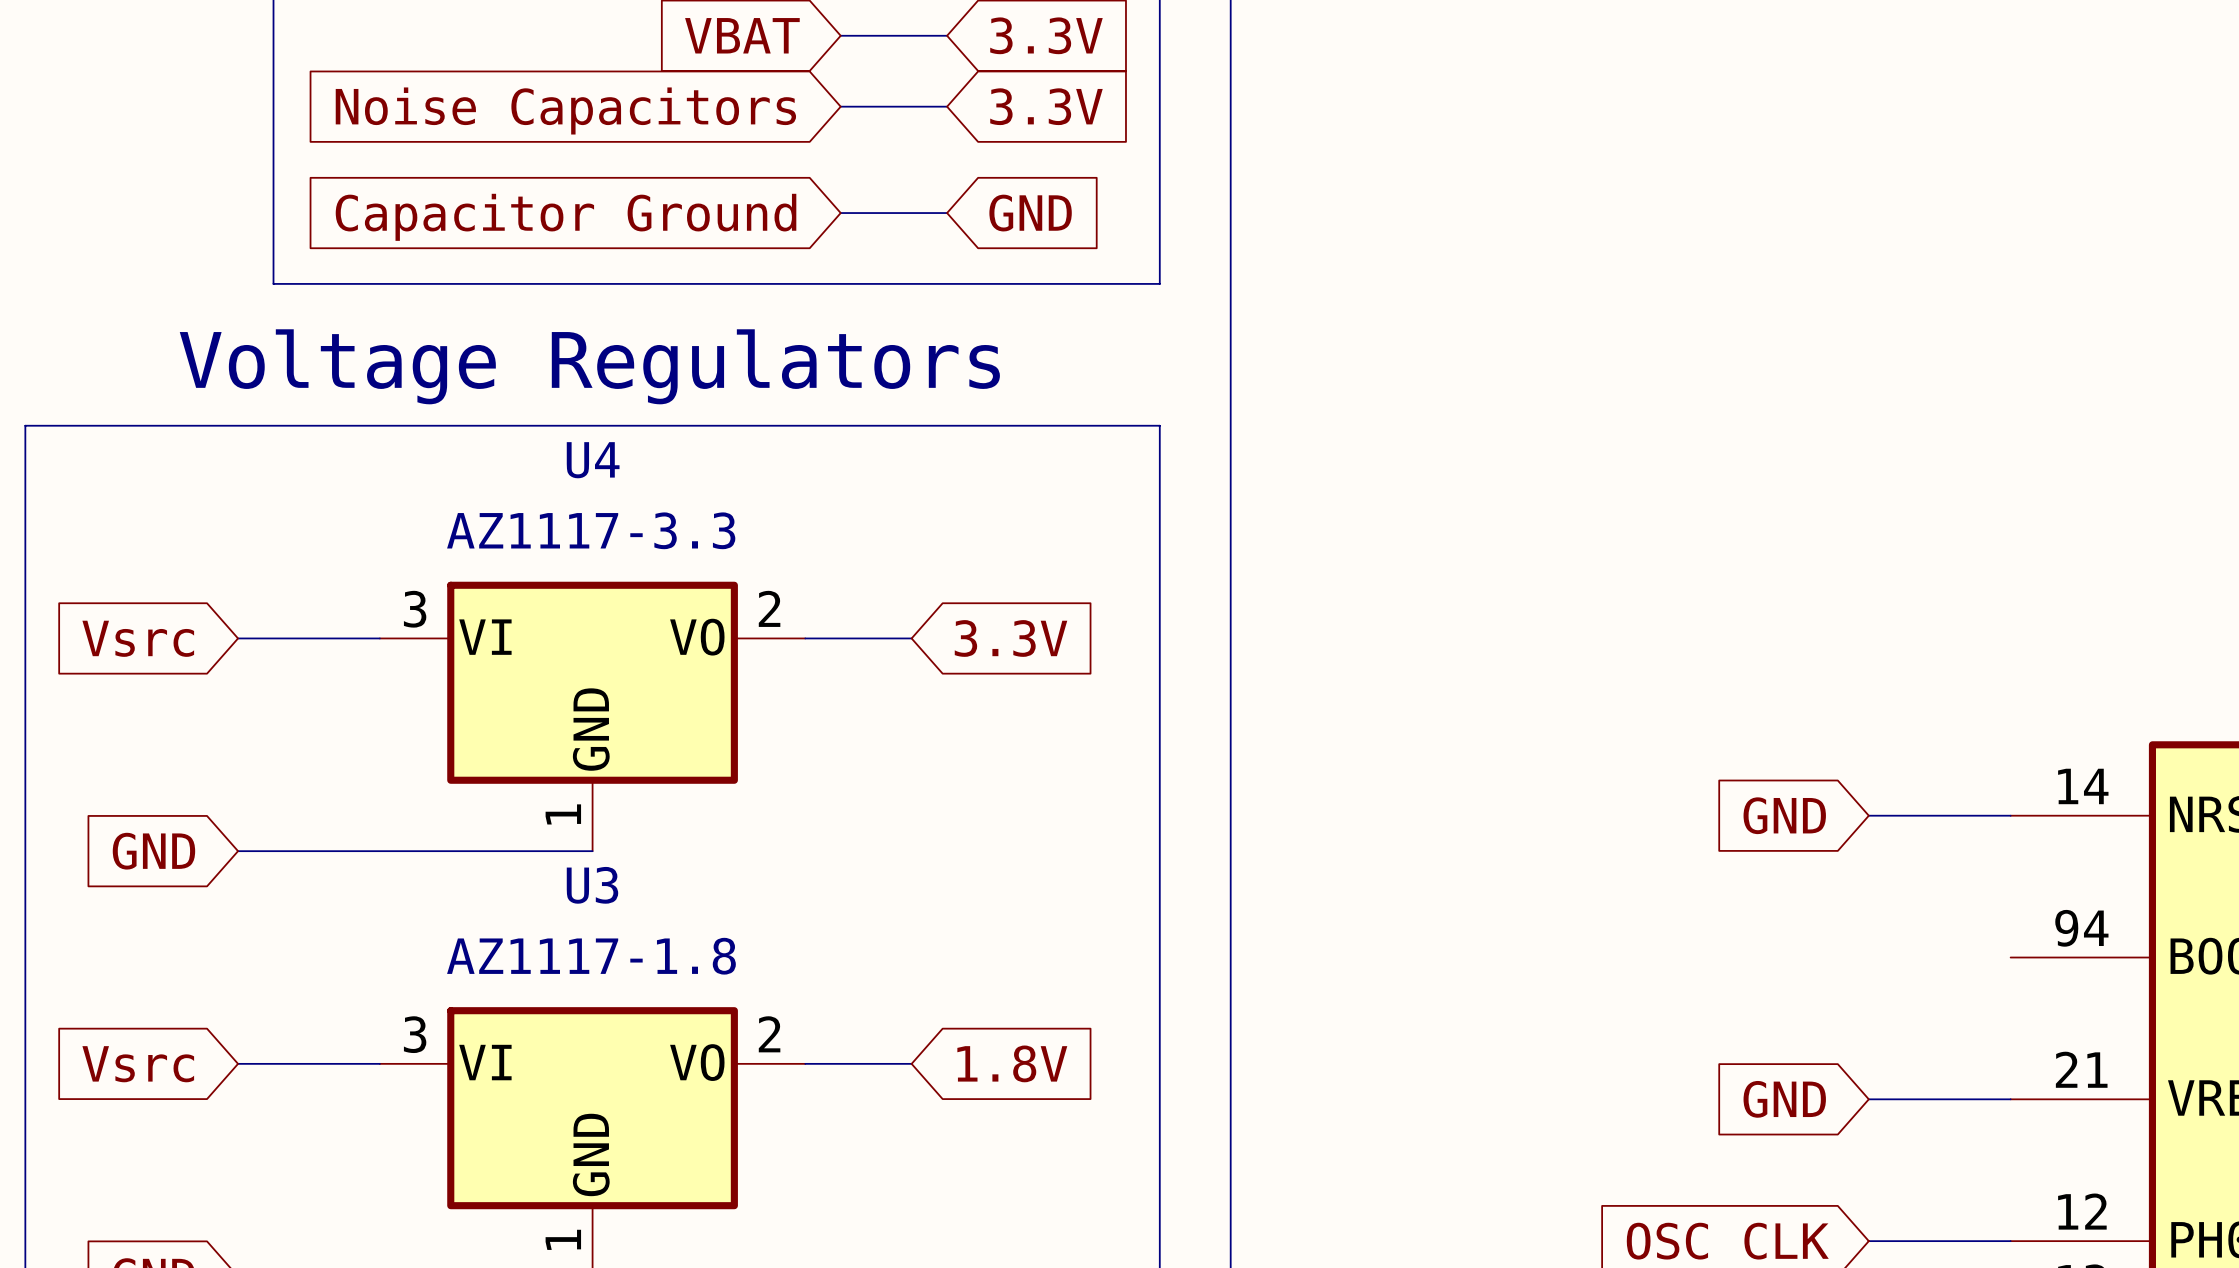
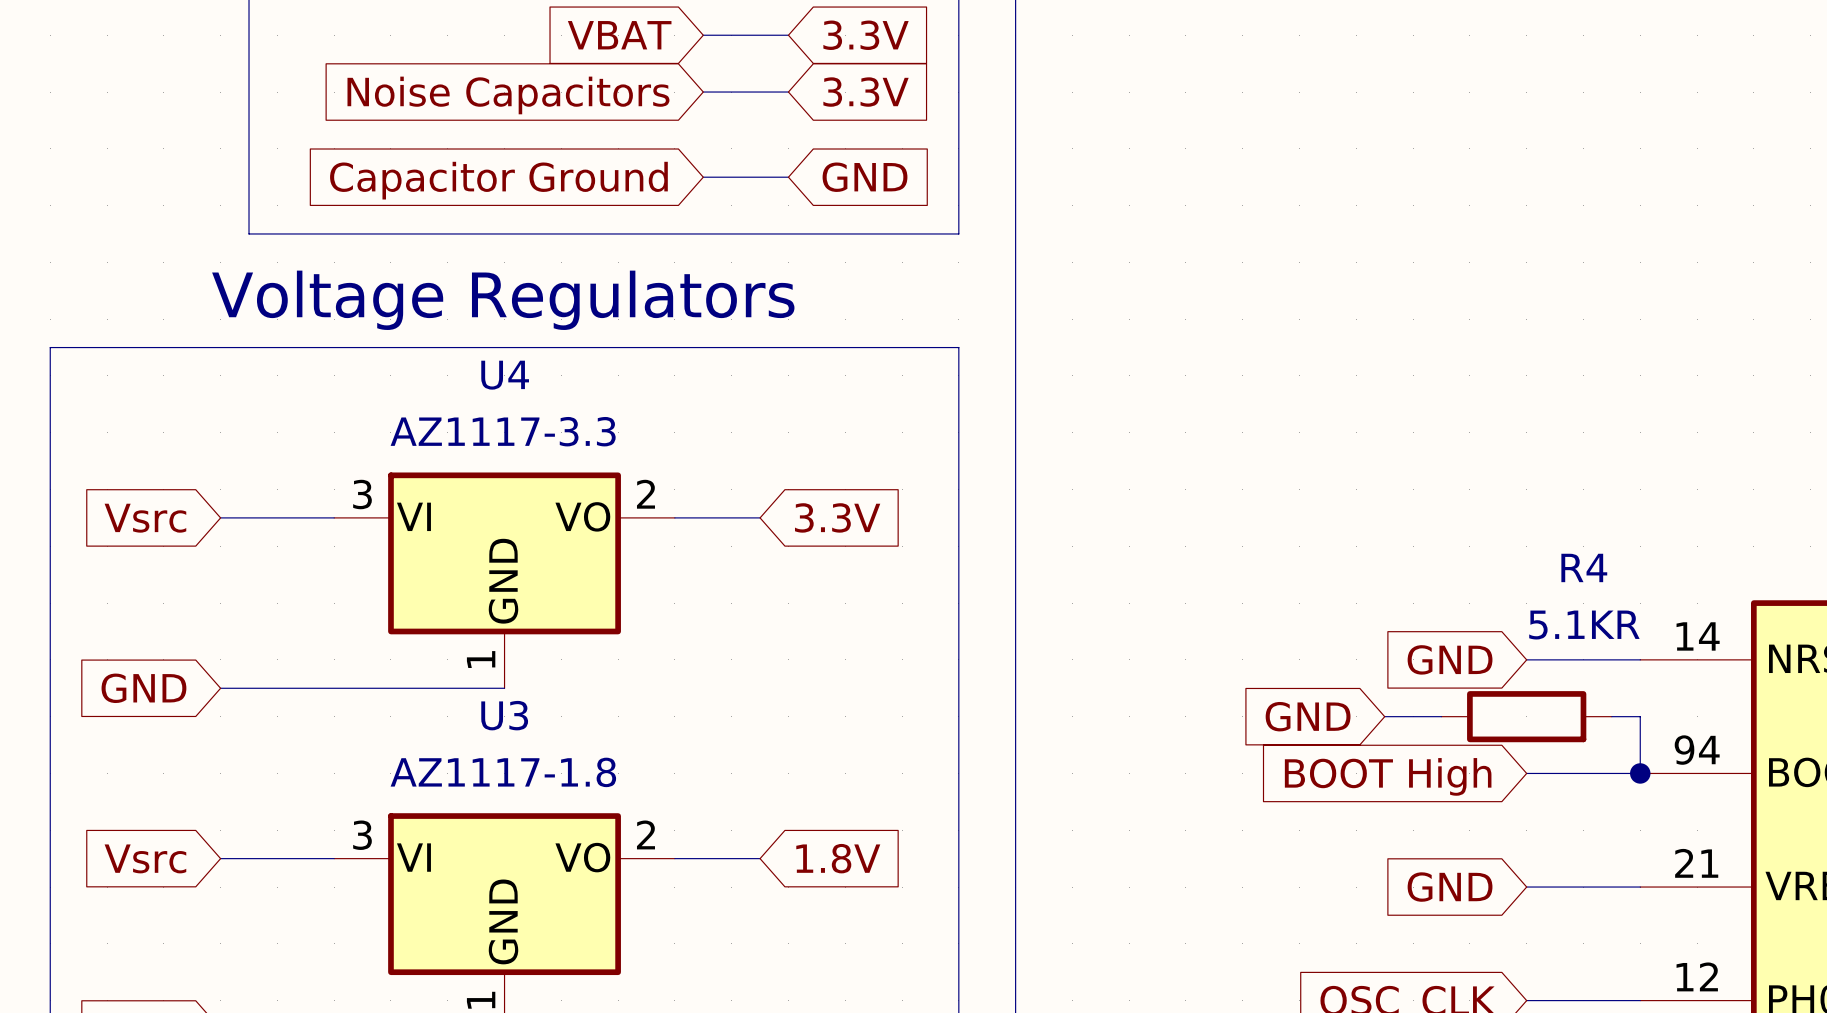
global label: none -> GND (1308, 716)
wire: none -> (1384, 716) (1441, 716)
R4: none -> 5.1KR (1526, 716)
wire: none -> (1611, 716) (1640, 716) (1640, 773) (1526, 773)
junction: none -> (1640, 773)
global label: none -> BOOT High (1388, 776)

